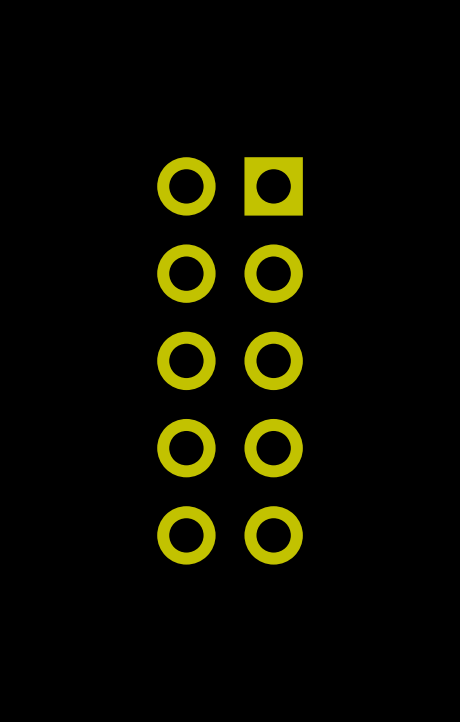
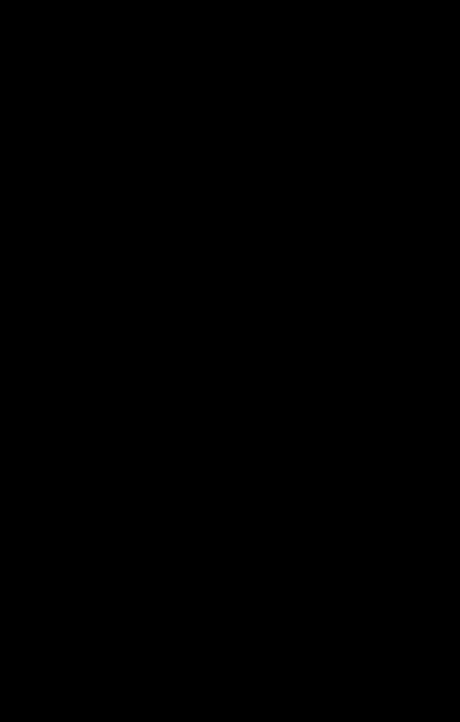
part: (230, 360) -> none

